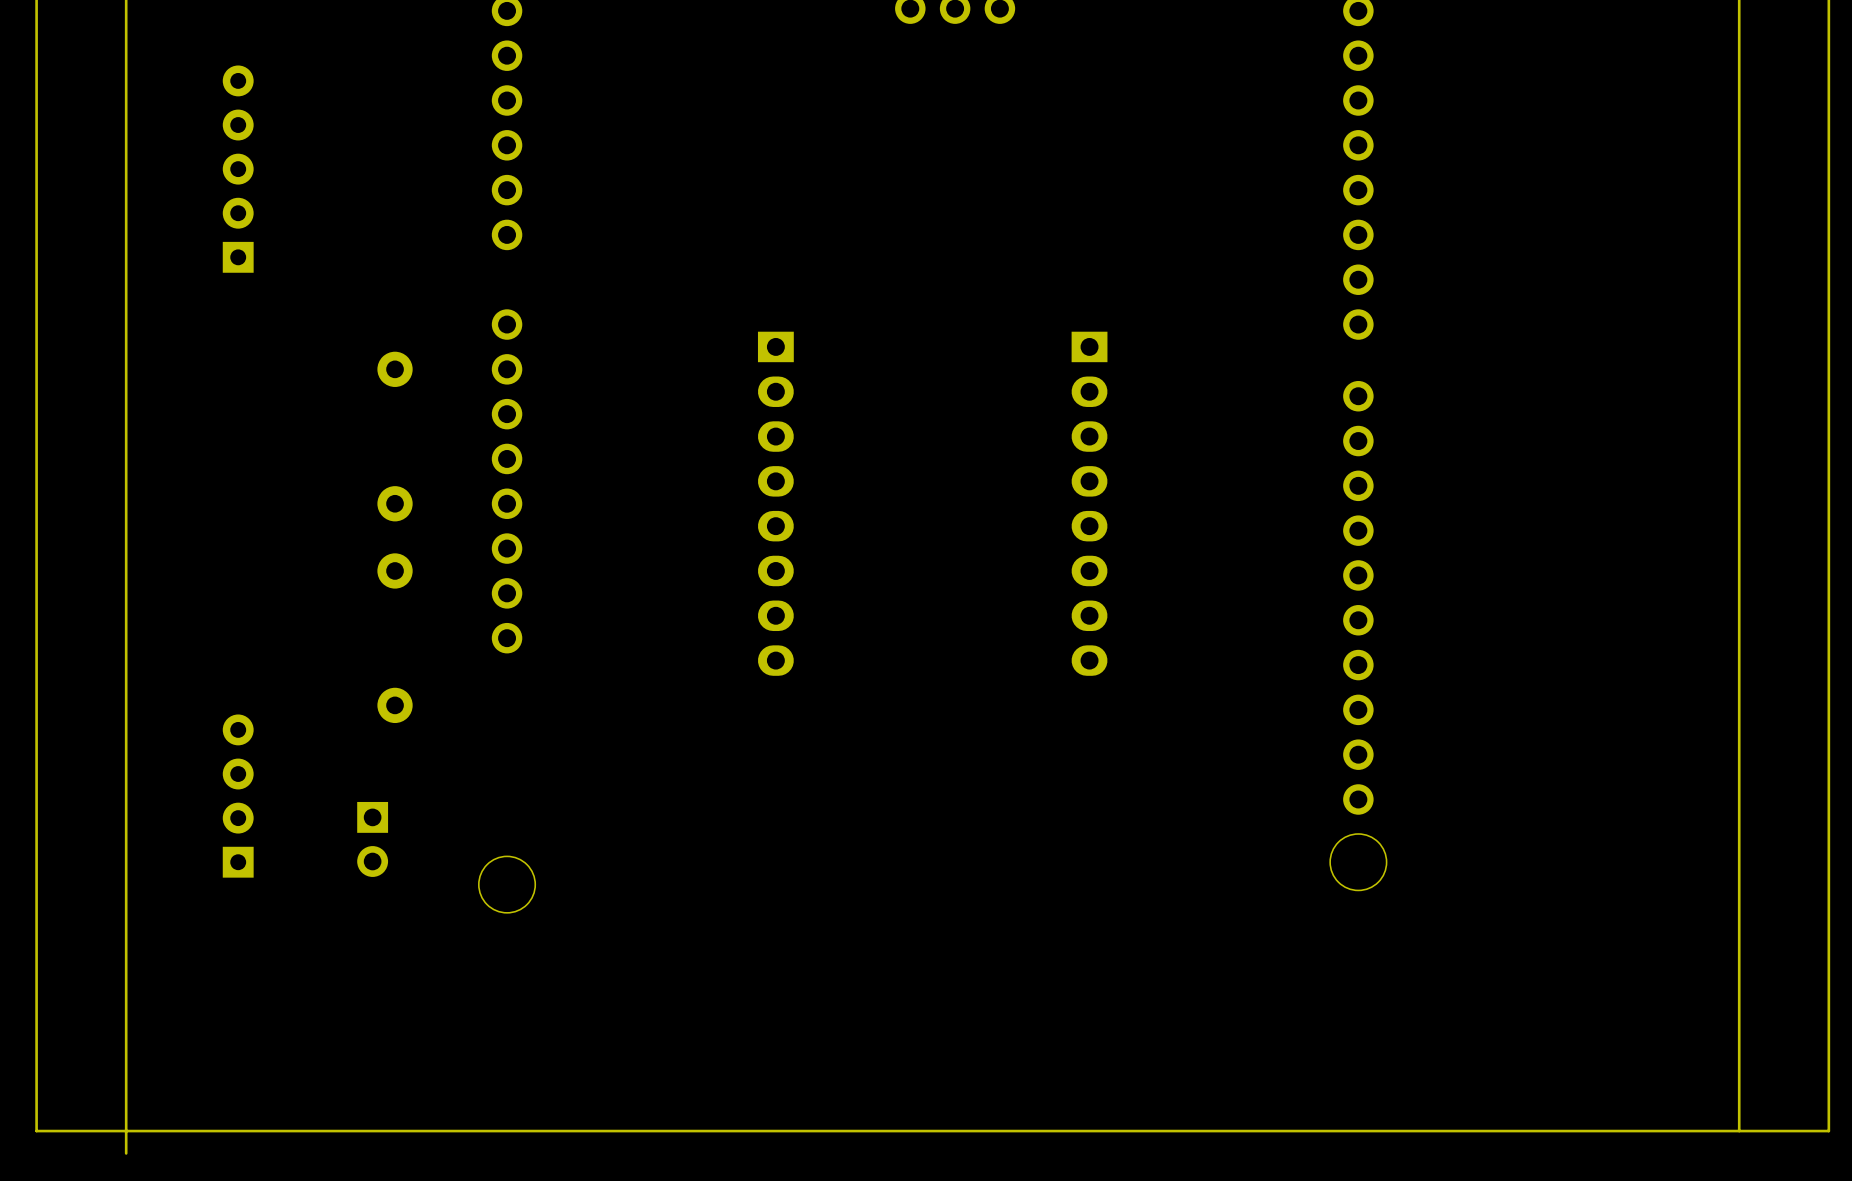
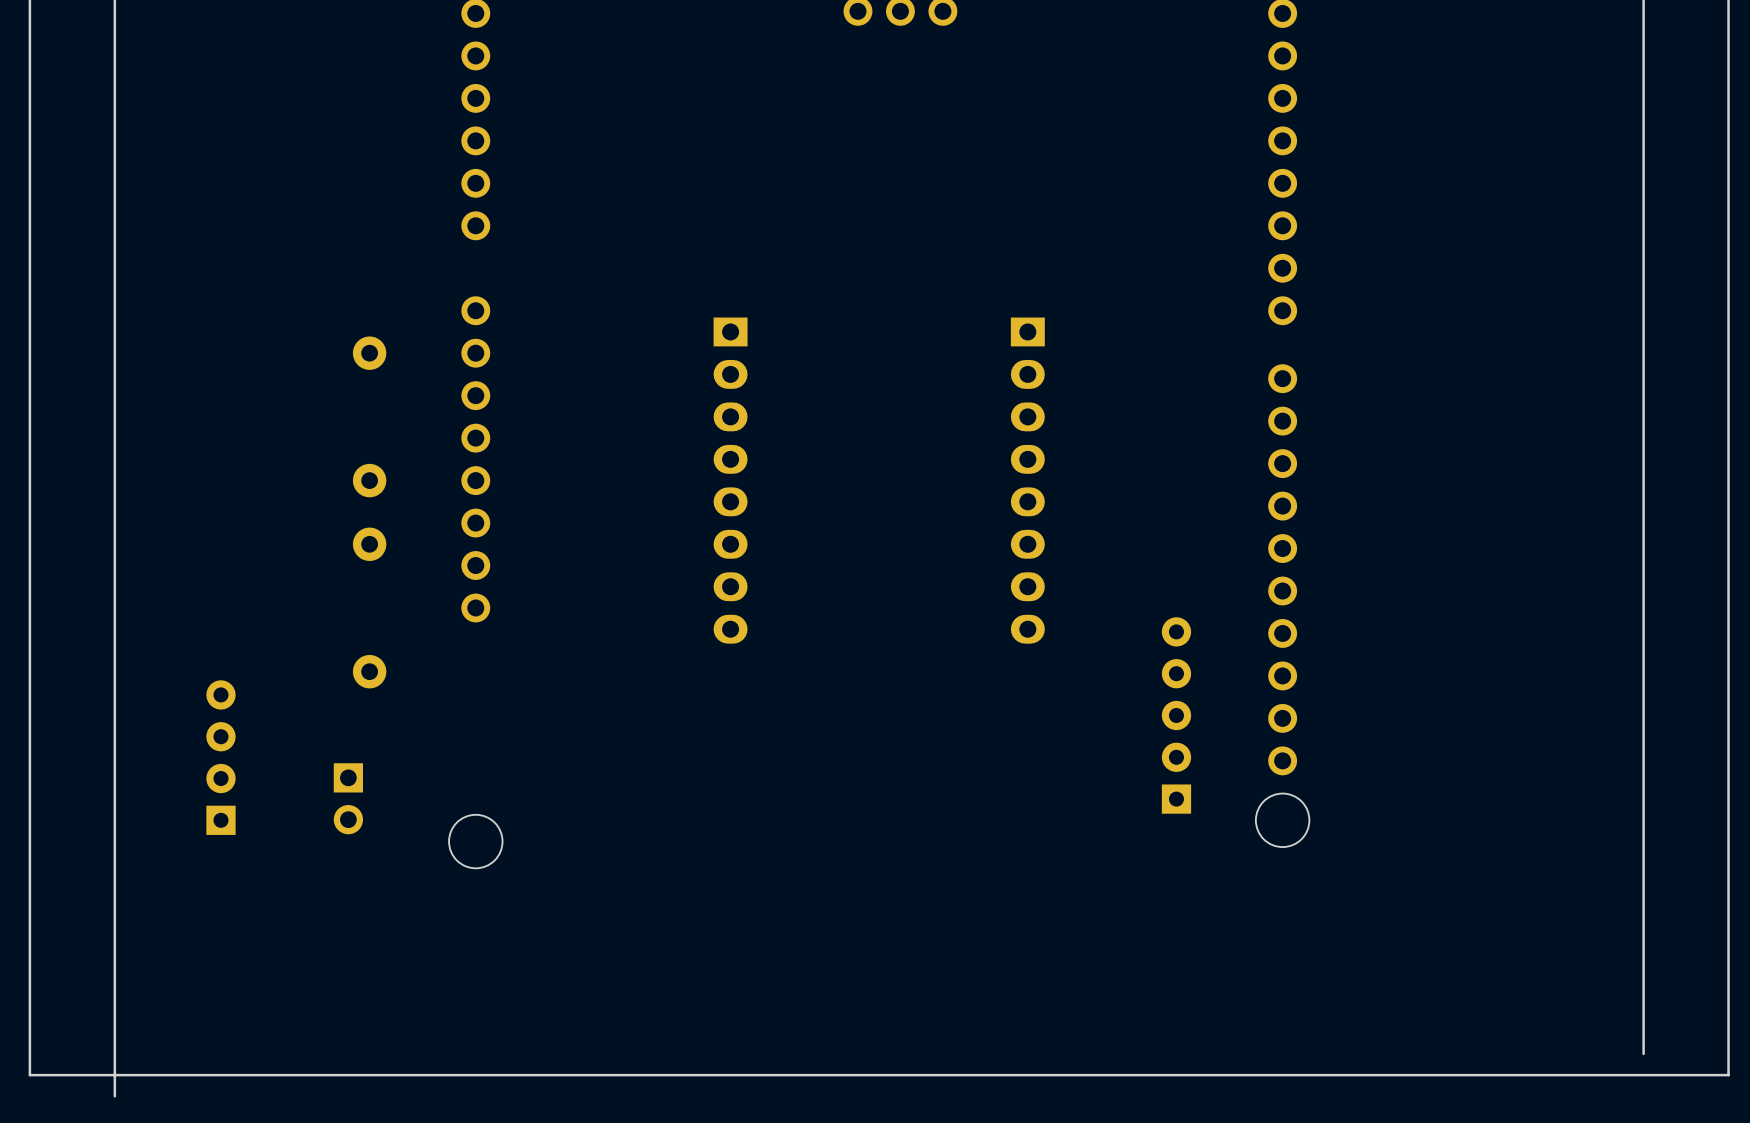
part: (238, 169) -> none
part: none -> (1176, 715)
board edge: (1739, 1108) (1739, 1131) -> none

